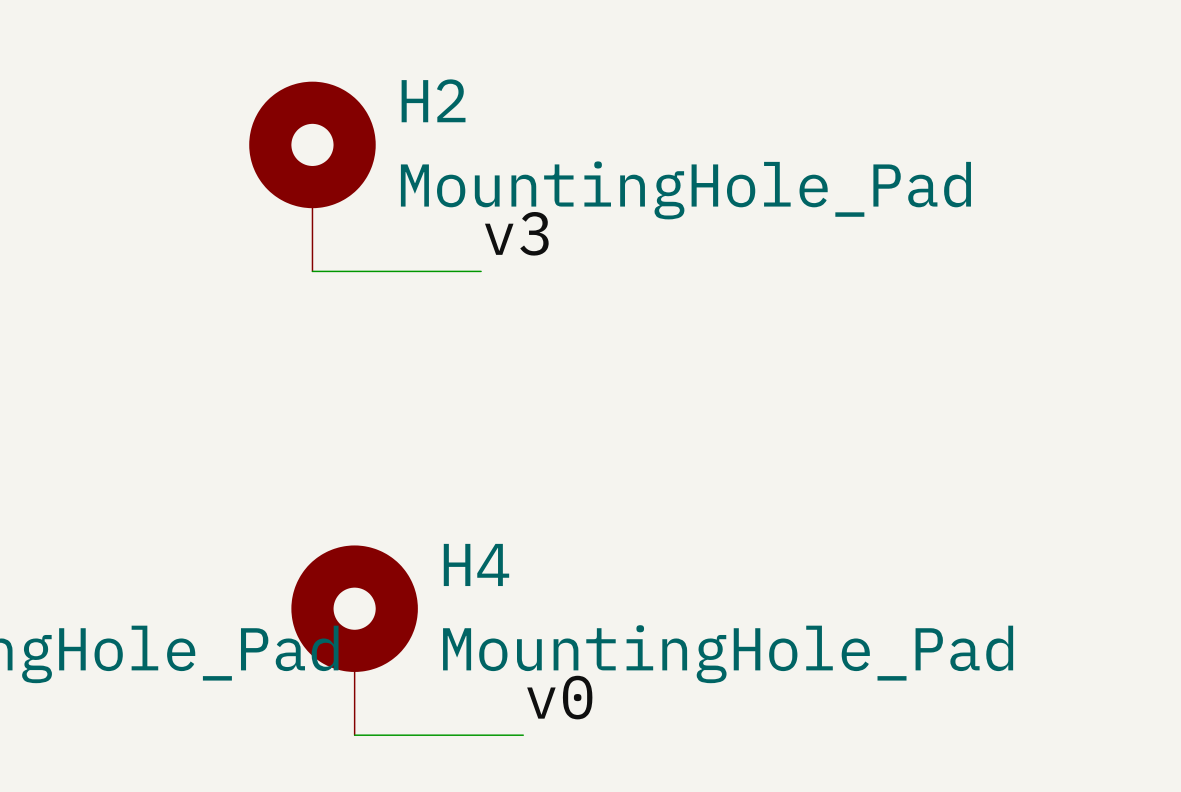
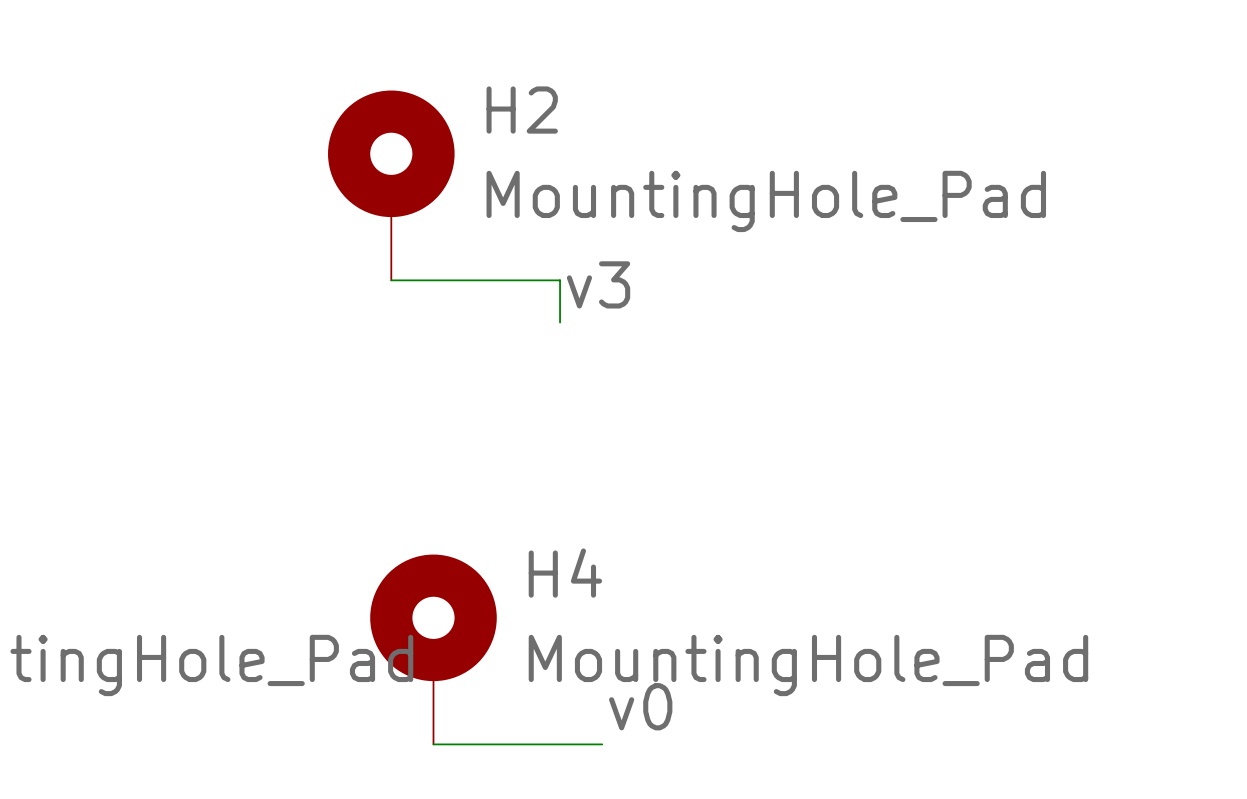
label position: v3 (516, 233) -> v3 (598, 284)
wire: none -> (560, 280) (560, 322)

